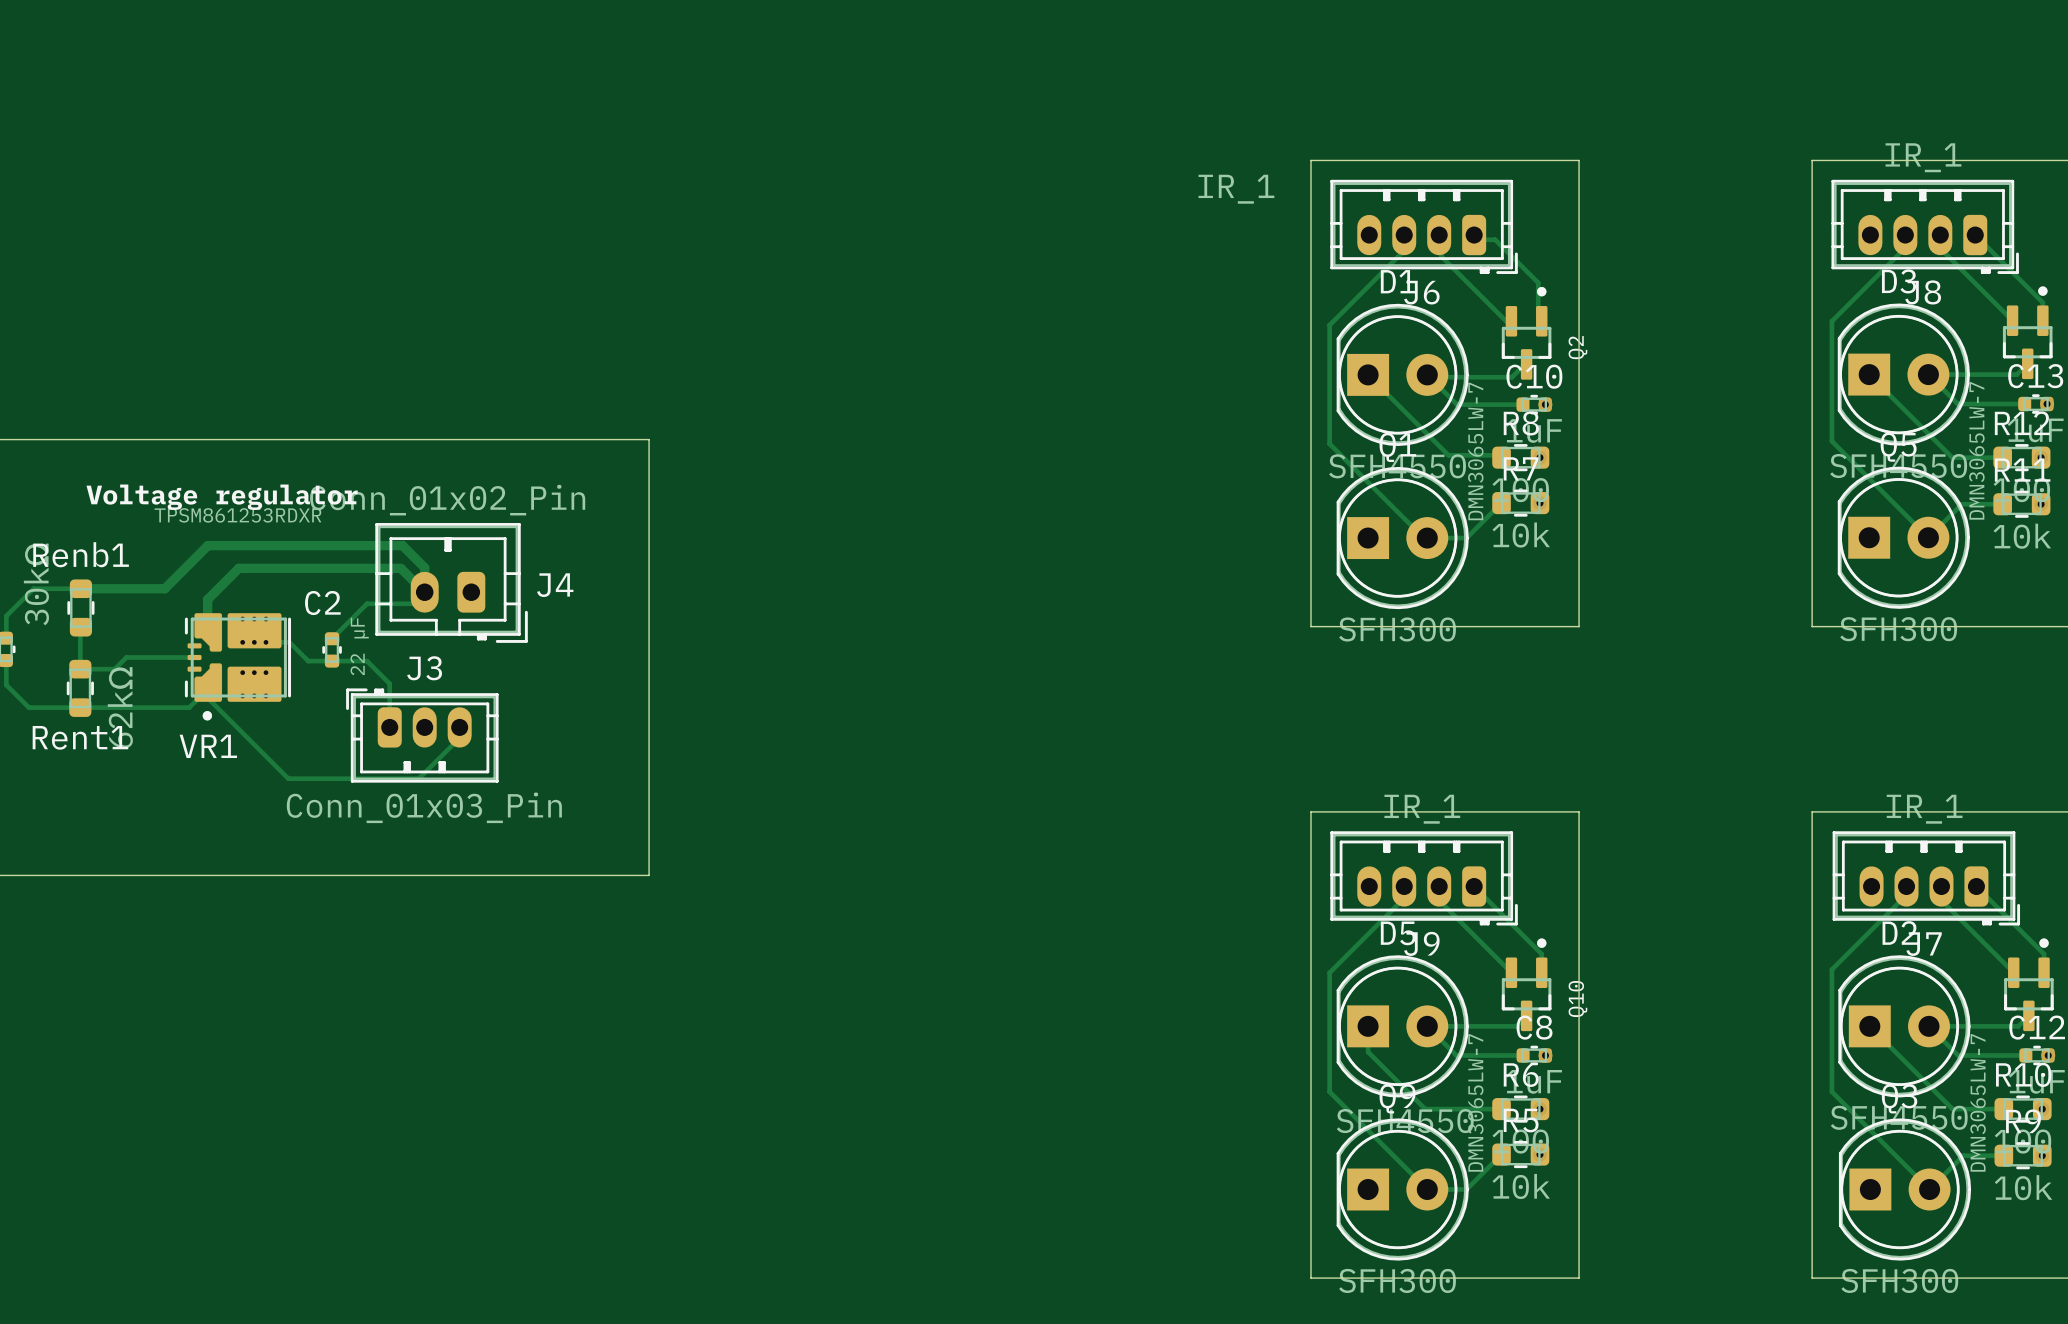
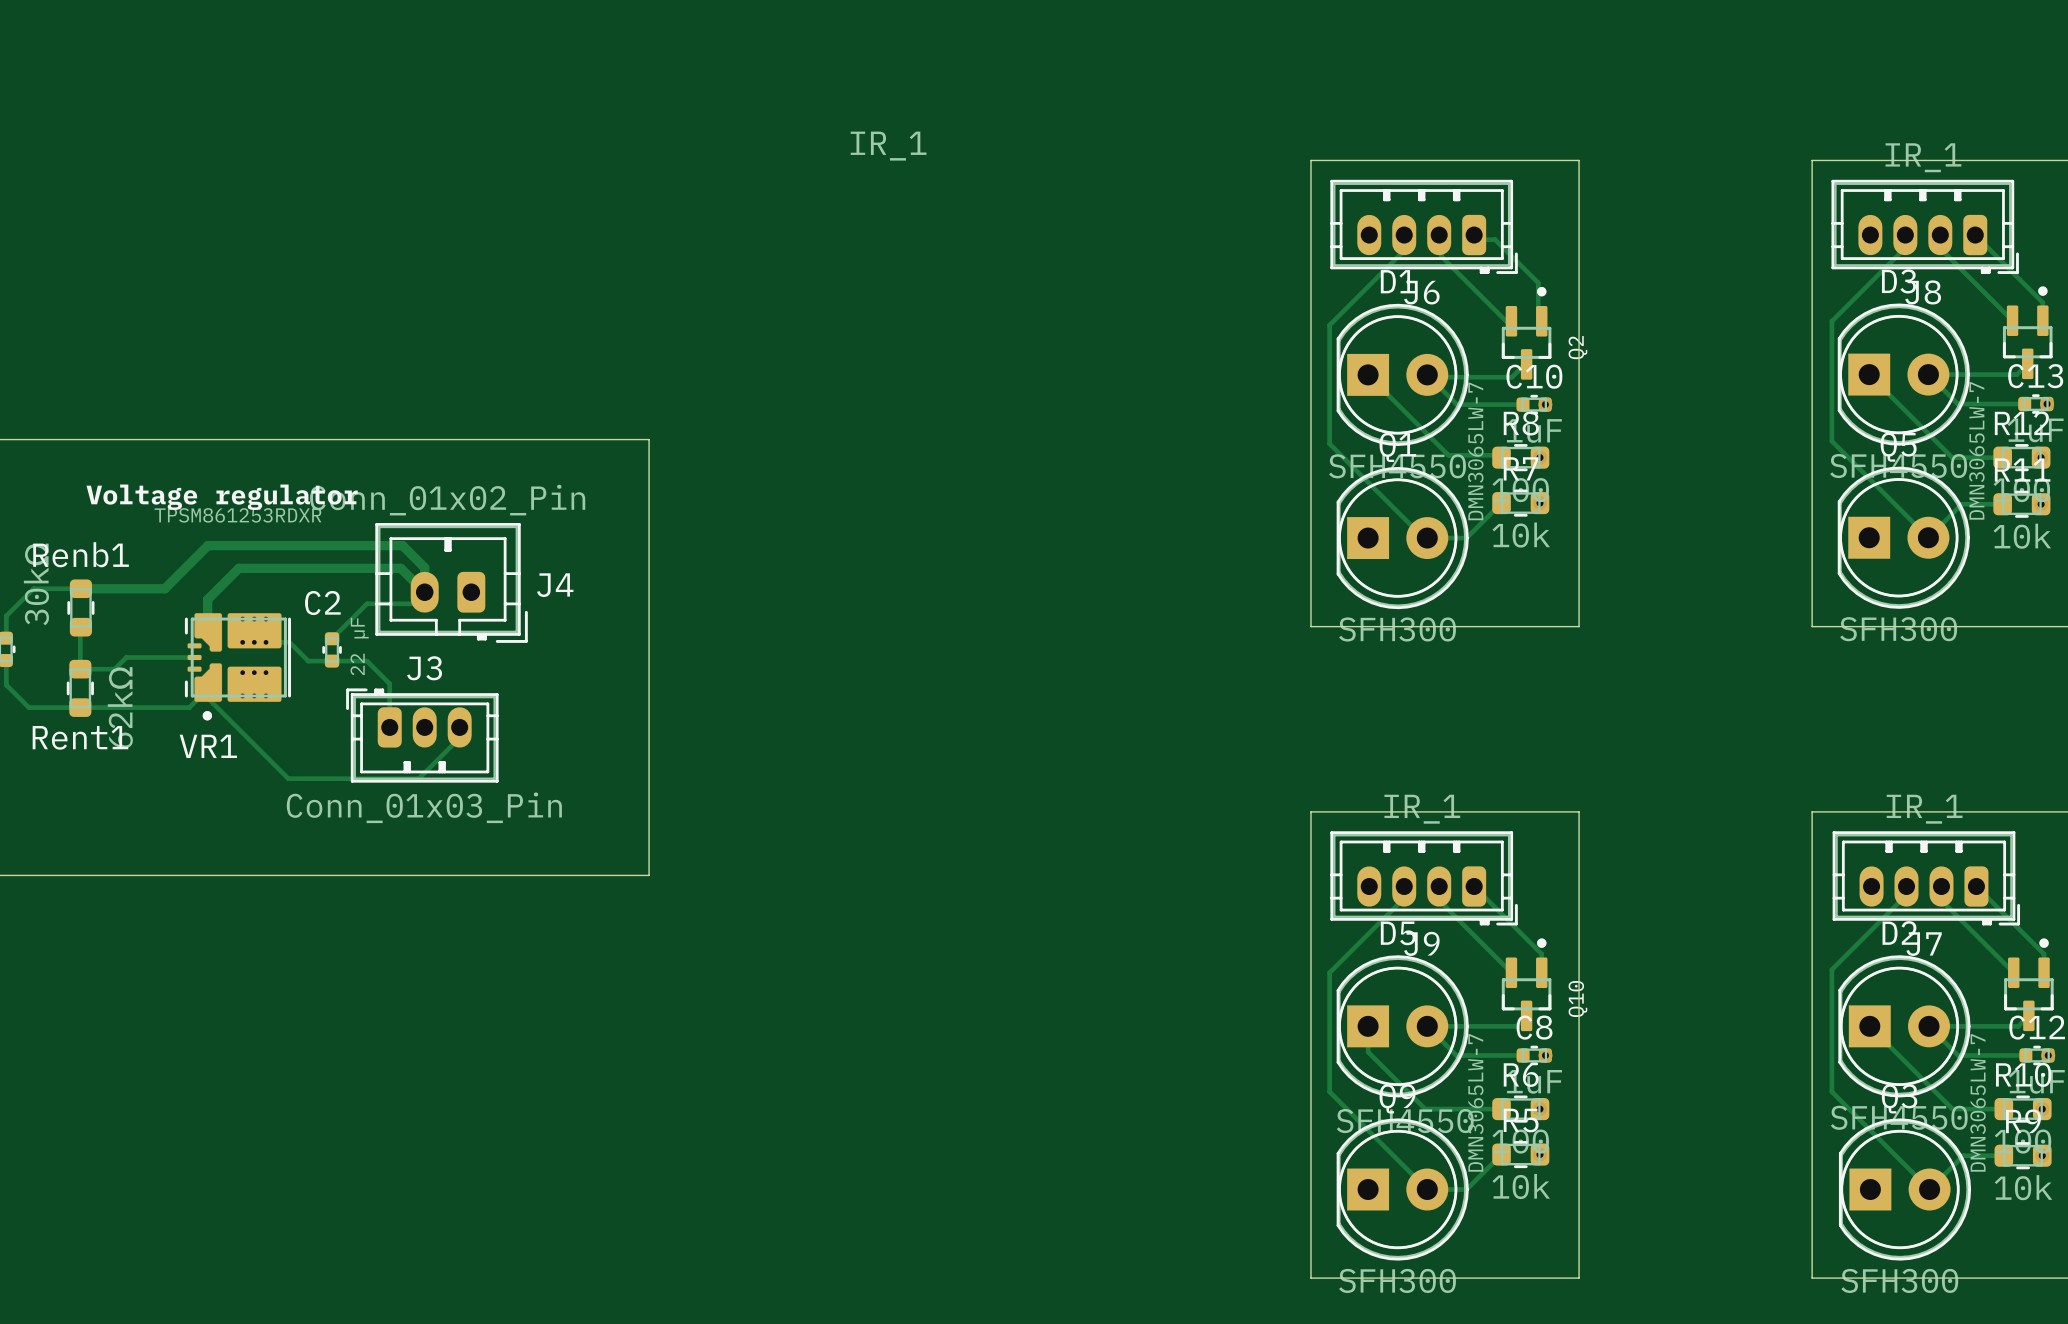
J6 value position: IR_1 (1236, 189) -> IR_1 (888, 146)

